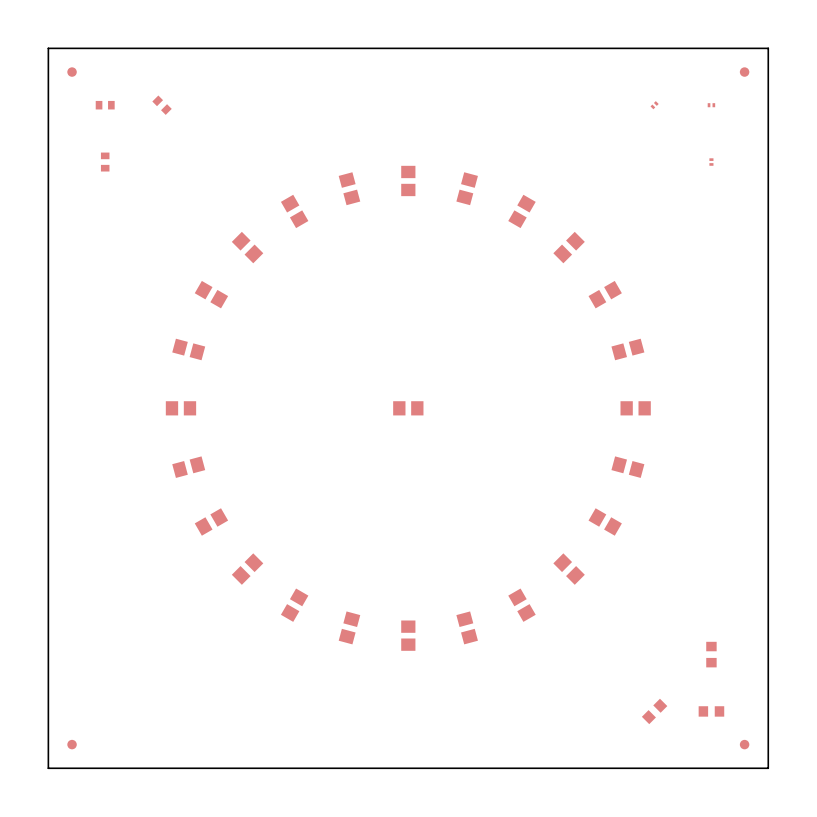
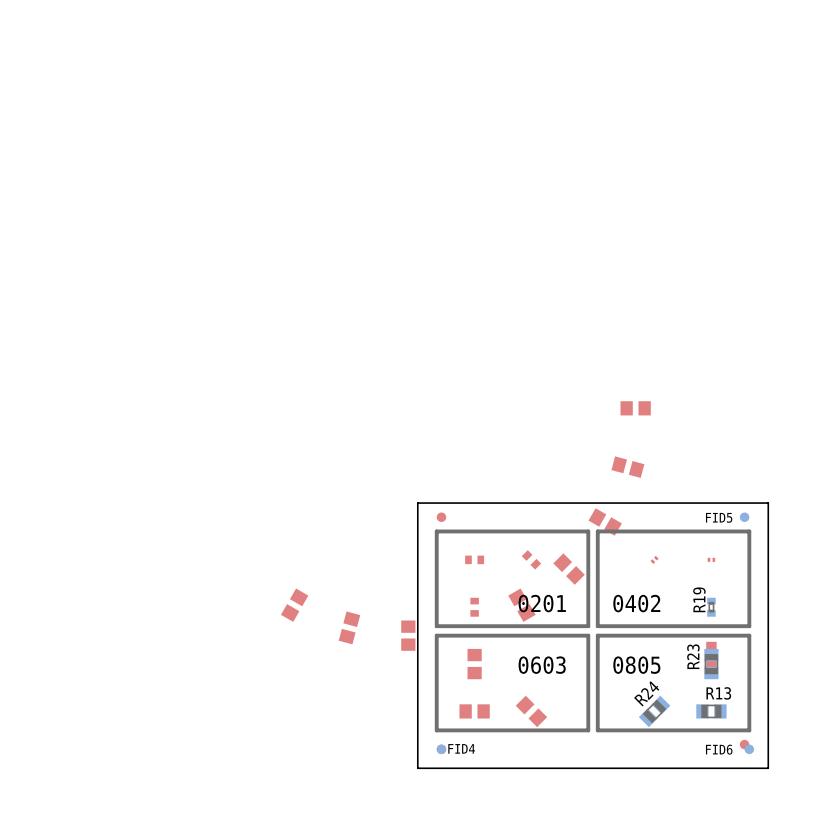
part: (72, 72) -> none
part: (744, 72) -> none
part: (105, 105) -> none
part: (162, 105) -> none
part: (654, 105) -> none
part: (711, 105) -> none
part: (105, 162) -> none
part: (711, 162) -> none
part: (408, 180) -> none
part: (349, 188) -> none
part: (467, 188) -> none
part: (294, 211) -> none
part: (521, 211) -> none
part: (247, 247) -> none
part: (569, 247) -> none
part: (211, 294) -> none
part: (605, 294) -> none
part: (188, 349) -> none
part: (627, 349) -> none
part: (180, 408) -> none
part: (408, 408) -> none
part: (188, 467) -> none
board edge: (768, 503) (768, 48) (48, 48) (48, 768) (417, 768) -> (768, 503) (417, 503) (417, 768)
part: none -> (441, 517)
text: none -> FID5 (719, 517)
part: none -> (744, 517)
part: (211, 521) -> none
line: none -> (588, 531) (436, 531) (436, 626) (588, 626) (588, 531)
line: none -> (749, 531) (597, 531) (597, 626) (749, 626) (749, 531)
part: none -> (474, 559)
part: none -> (531, 559)
part: none -> (654, 559)
part: none -> (711, 559)
part: (247, 569) -> none
text: none -> 0201 (542, 603)
text: none -> 0402 (636, 603)
part: none -> (474, 607)
R19: none -> (711, 607)
part: (467, 627) -> none
line: none -> (588, 635) (588, 730) (436, 730) (436, 635) (588, 635)
line: none -> (749, 635) (749, 730) (597, 730) (597, 635) (749, 635)
part: none -> (474, 664)
R23: none -> (711, 664)
text: none -> 0603 (542, 665)
text: none -> 0805 (636, 665)
part: none -> (474, 711)
part: none -> (531, 711)
R24: none -> (654, 711)
R13: none -> (711, 711)
part: (72, 744) -> none
text: none -> FID4 (461, 748)
part: none -> (441, 749)
text: none -> FID6 (719, 749)
part: none -> (749, 749)

